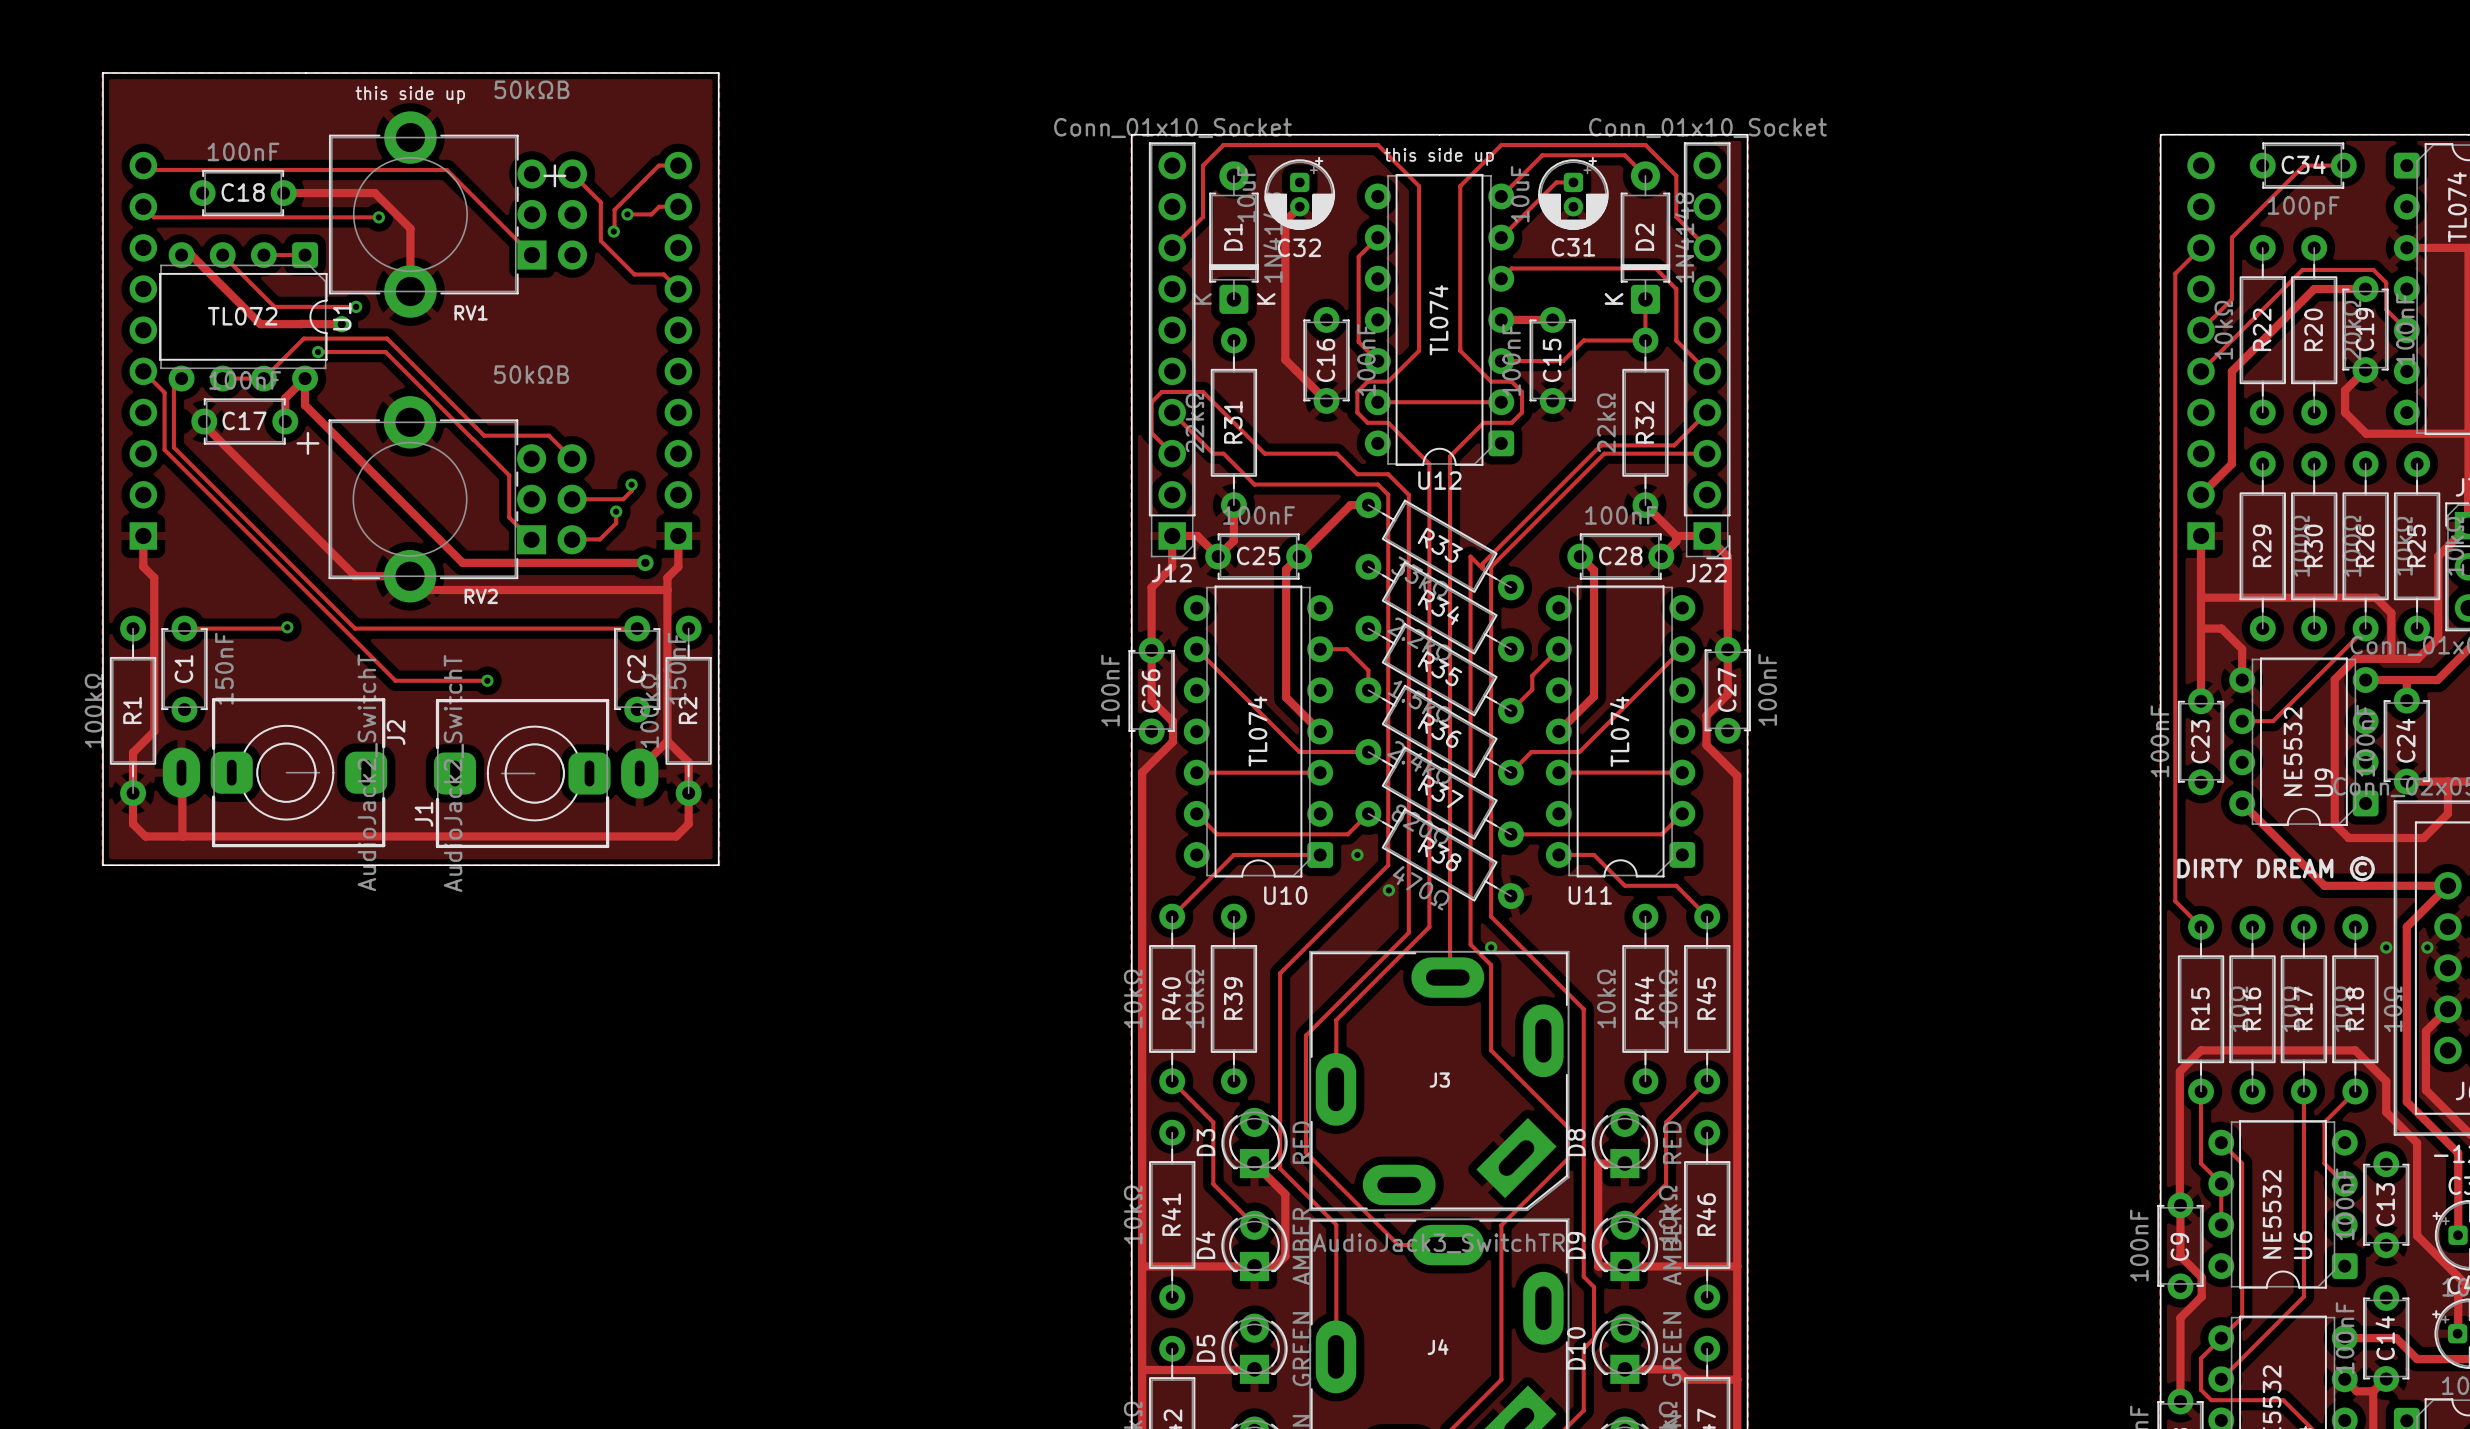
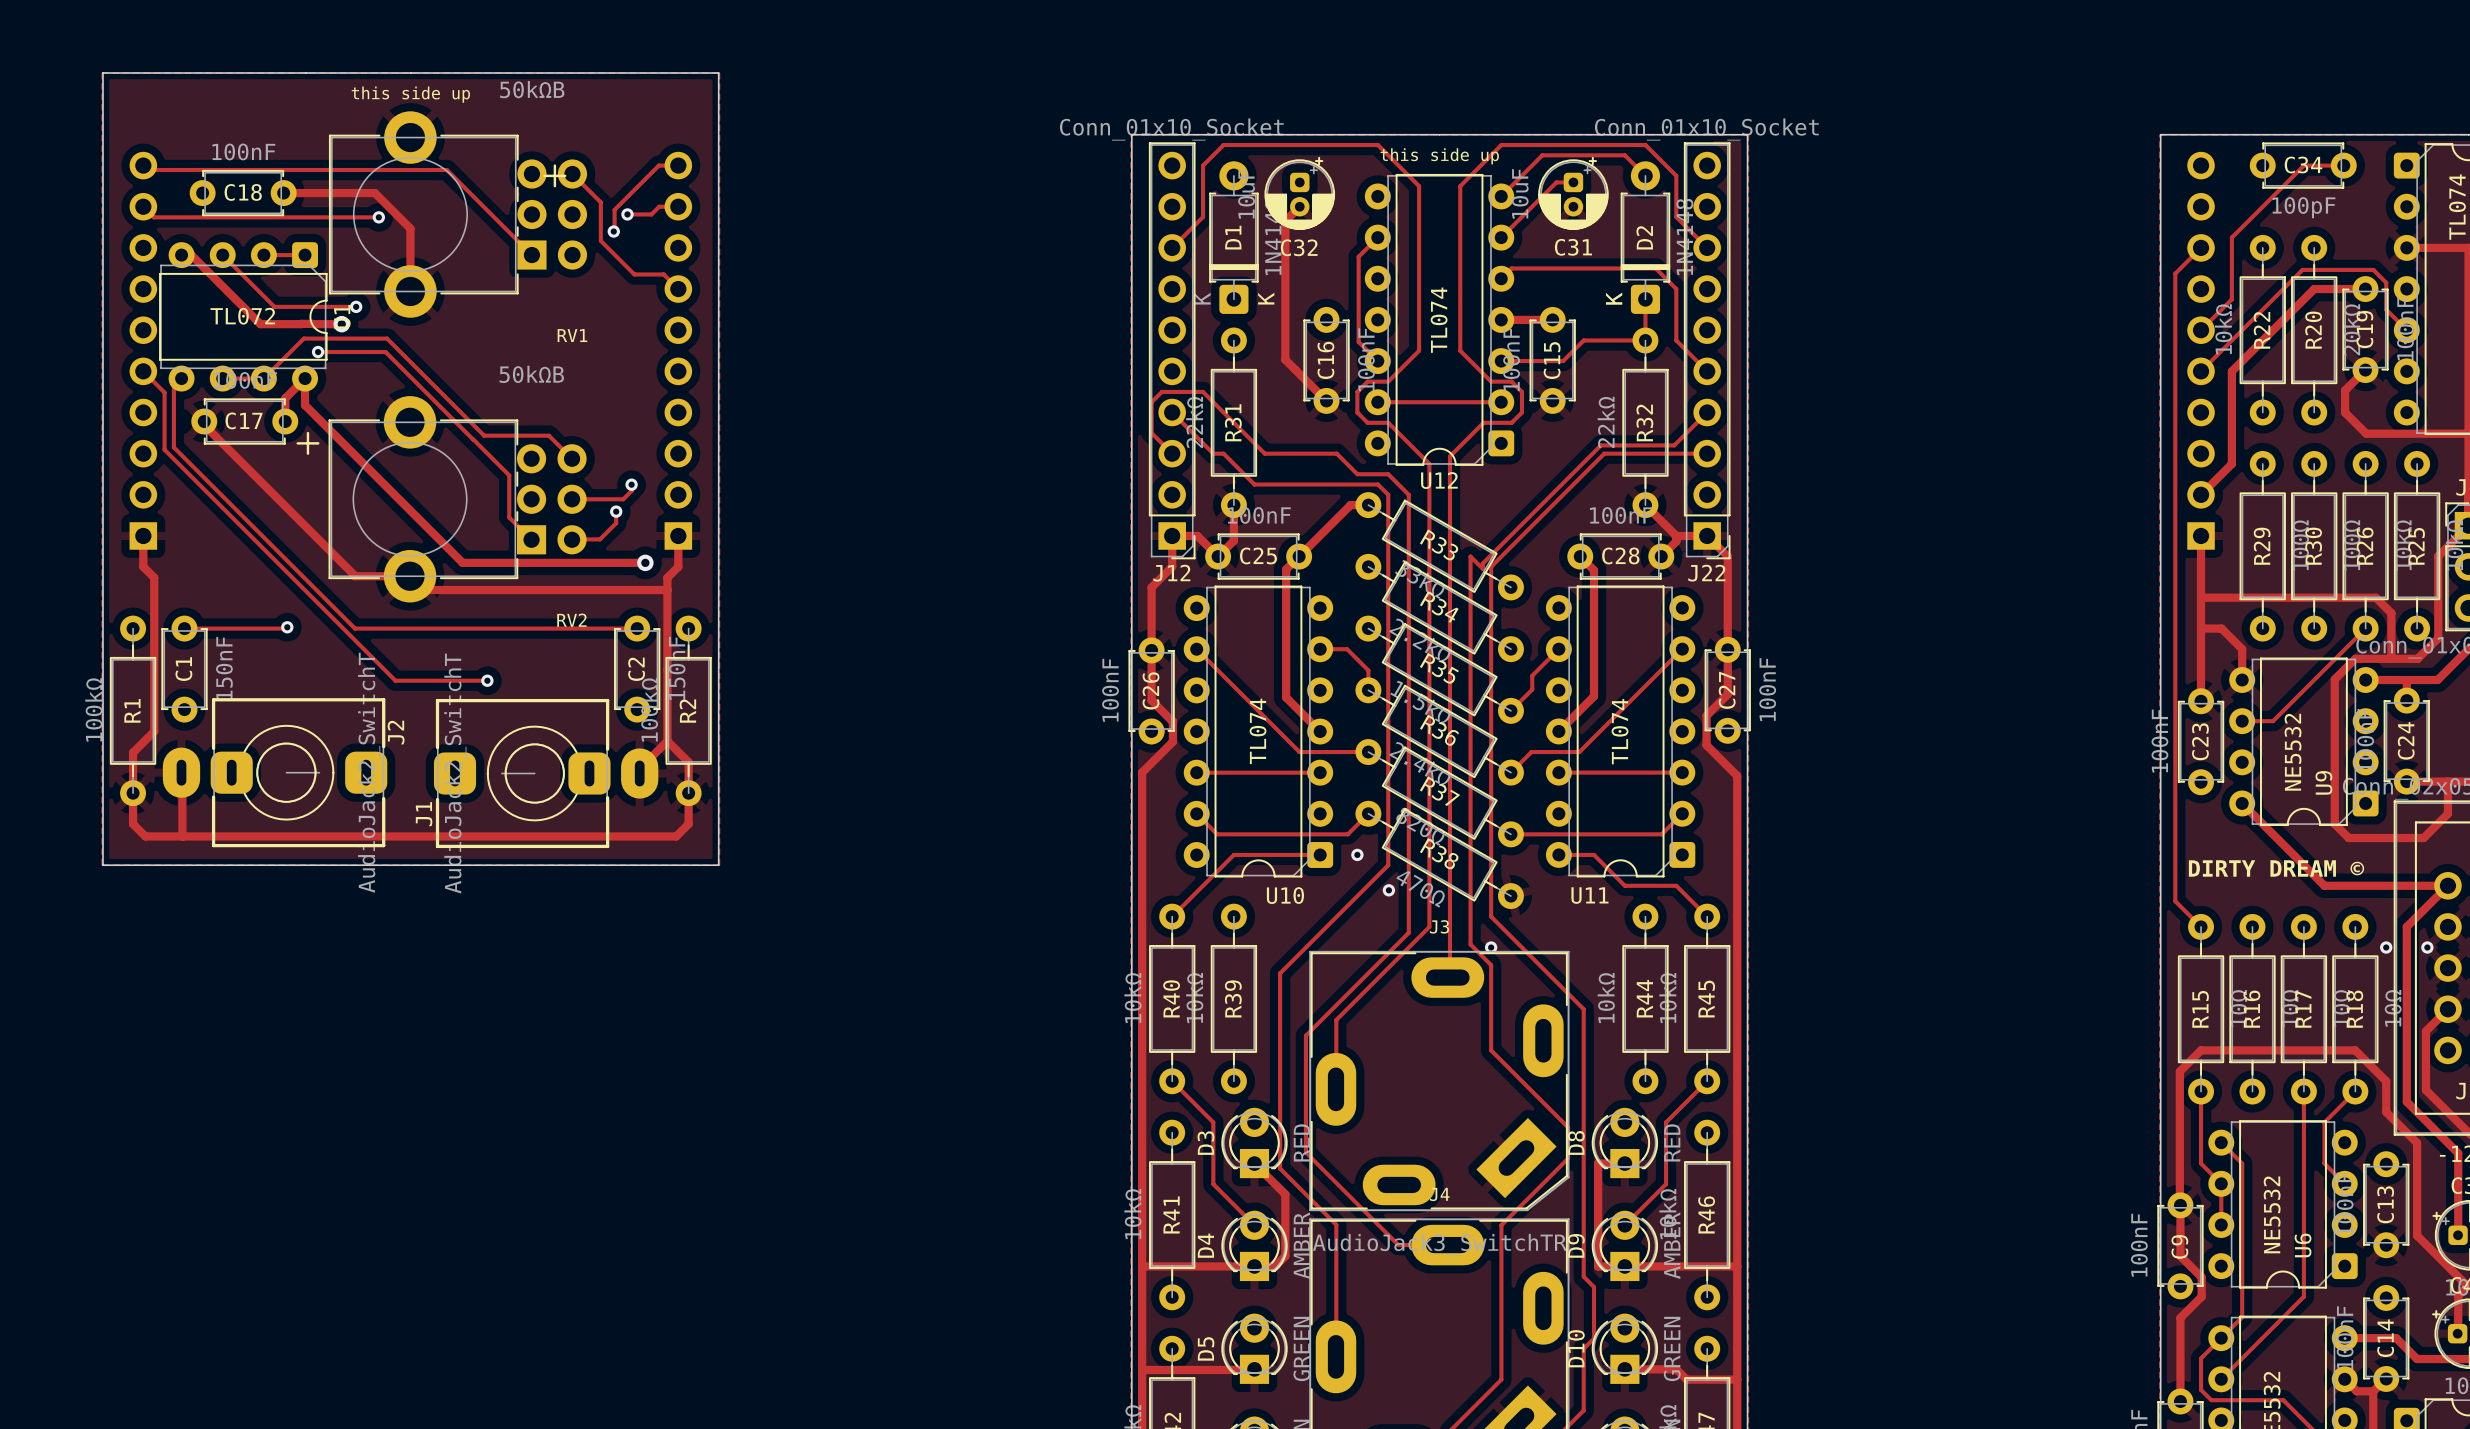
RV1 name position: RV1 (471, 312) -> RV1 (572, 335)
RV2 name position: RV2 (481, 596) -> RV2 (571, 620)
J3 name position: J3 (1439, 1080) -> J3 (1439, 926)
J4 name position: J4 (1438, 1347) -> J4 (1439, 1194)

